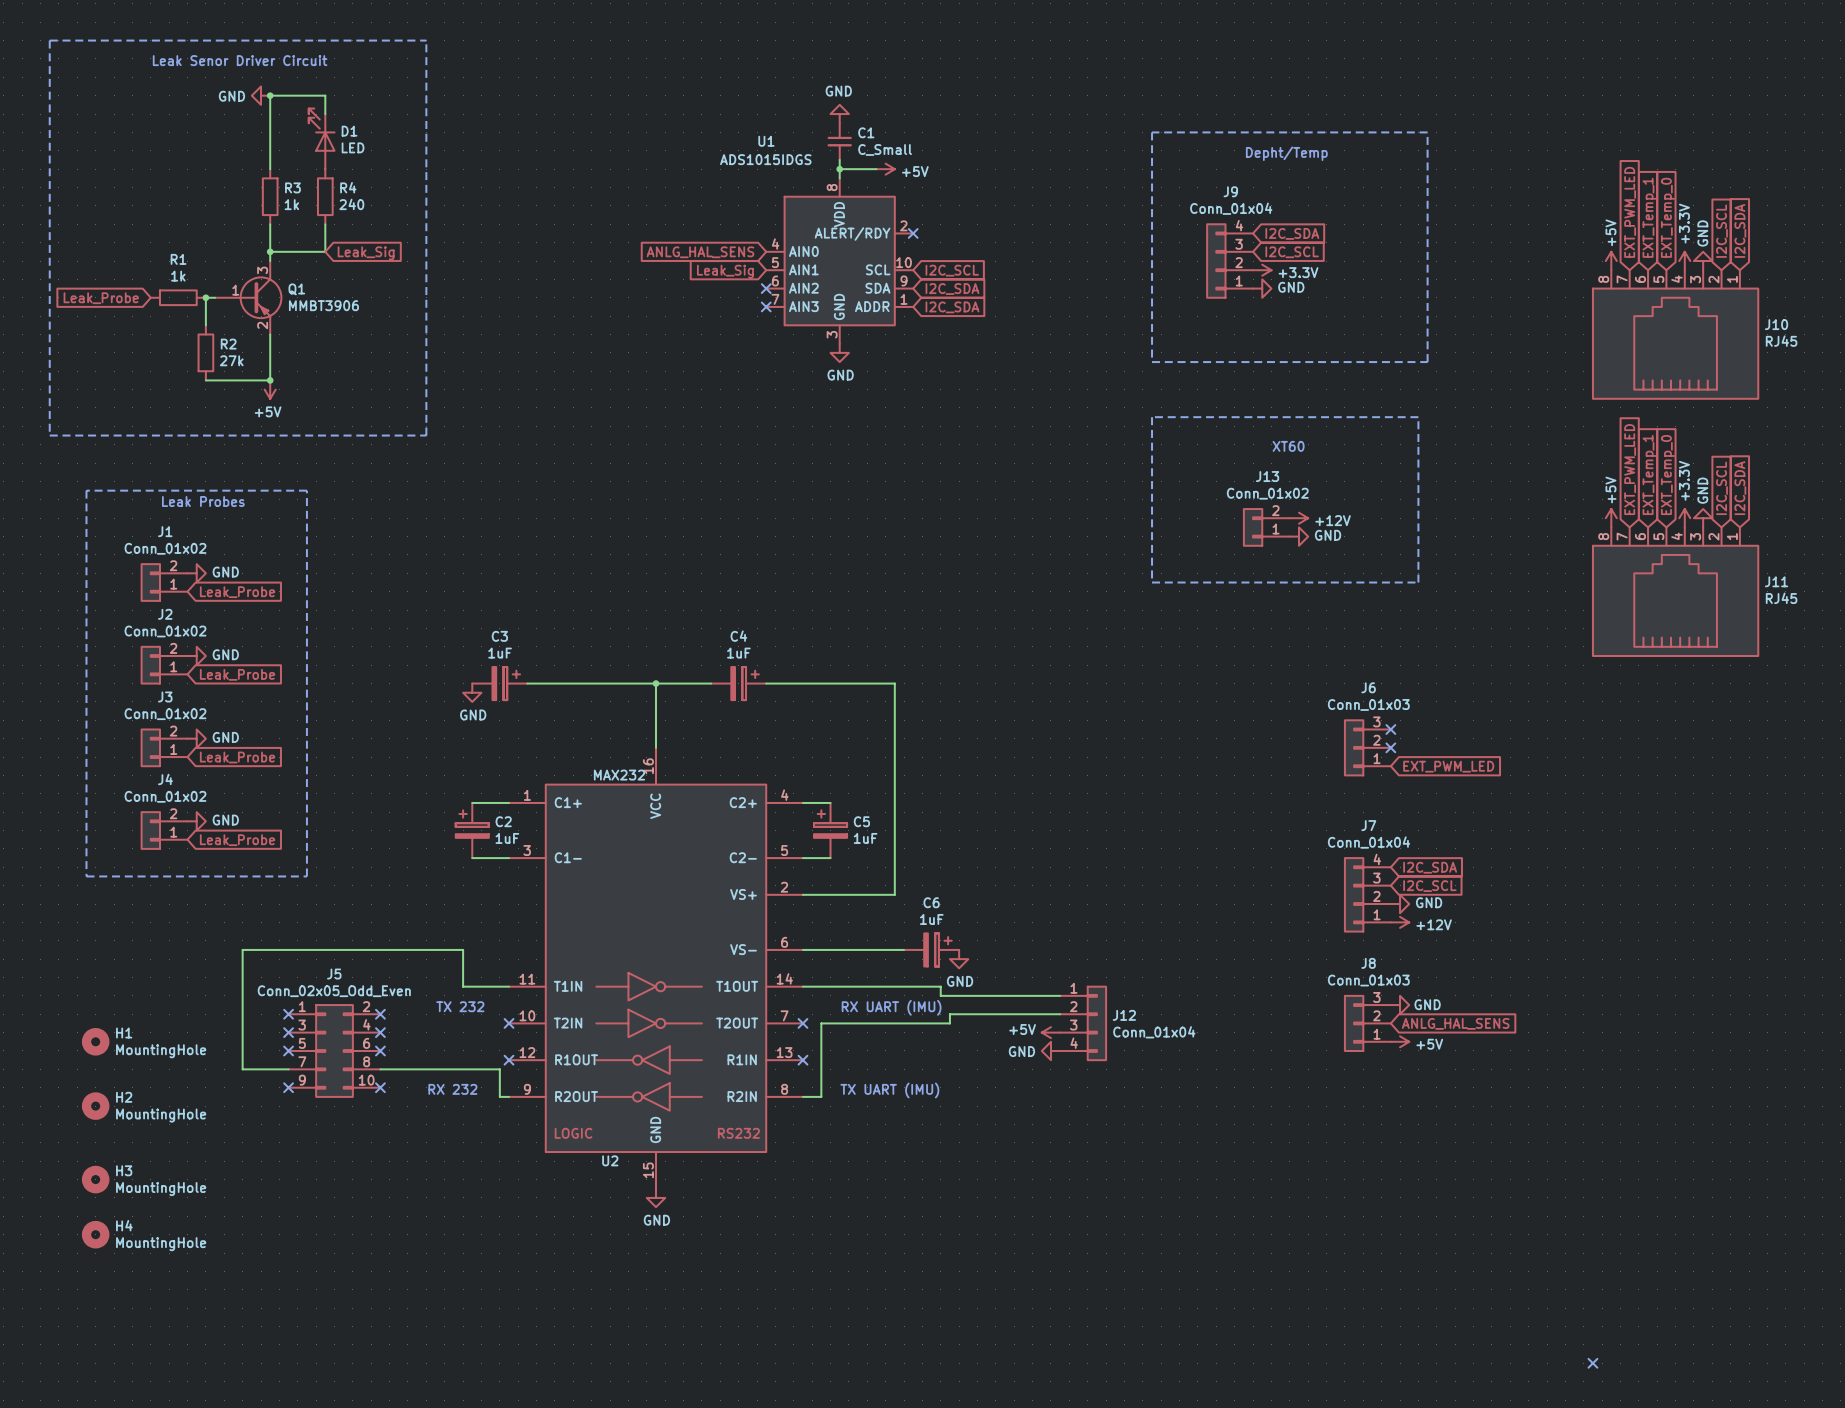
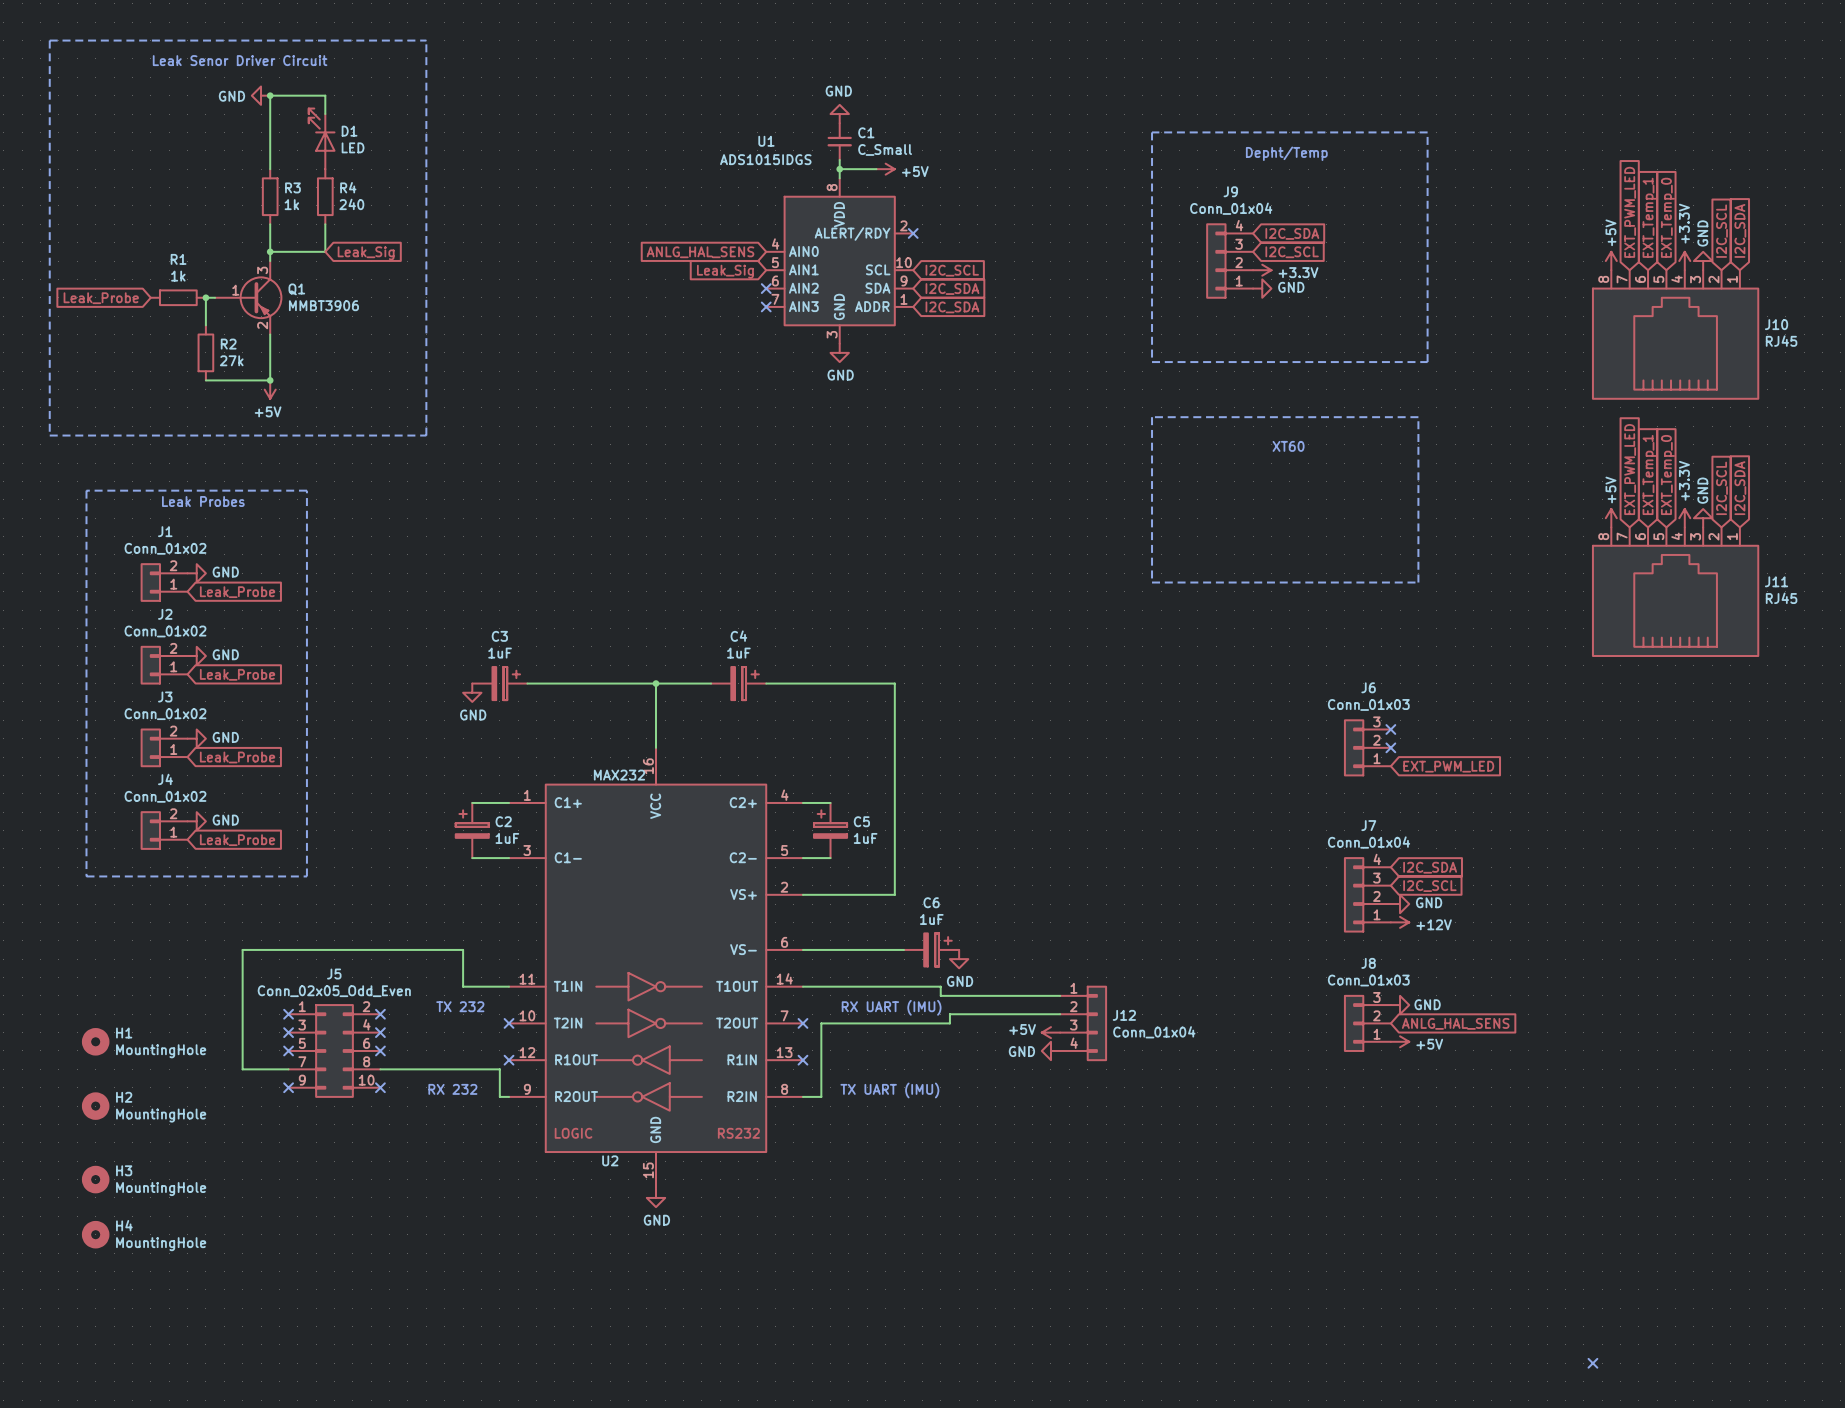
power symbol: +12V (1298, 518) -> none
J13: Conn_01x02 (1266, 527) -> none
power symbol: GND (1298, 536) -> none

